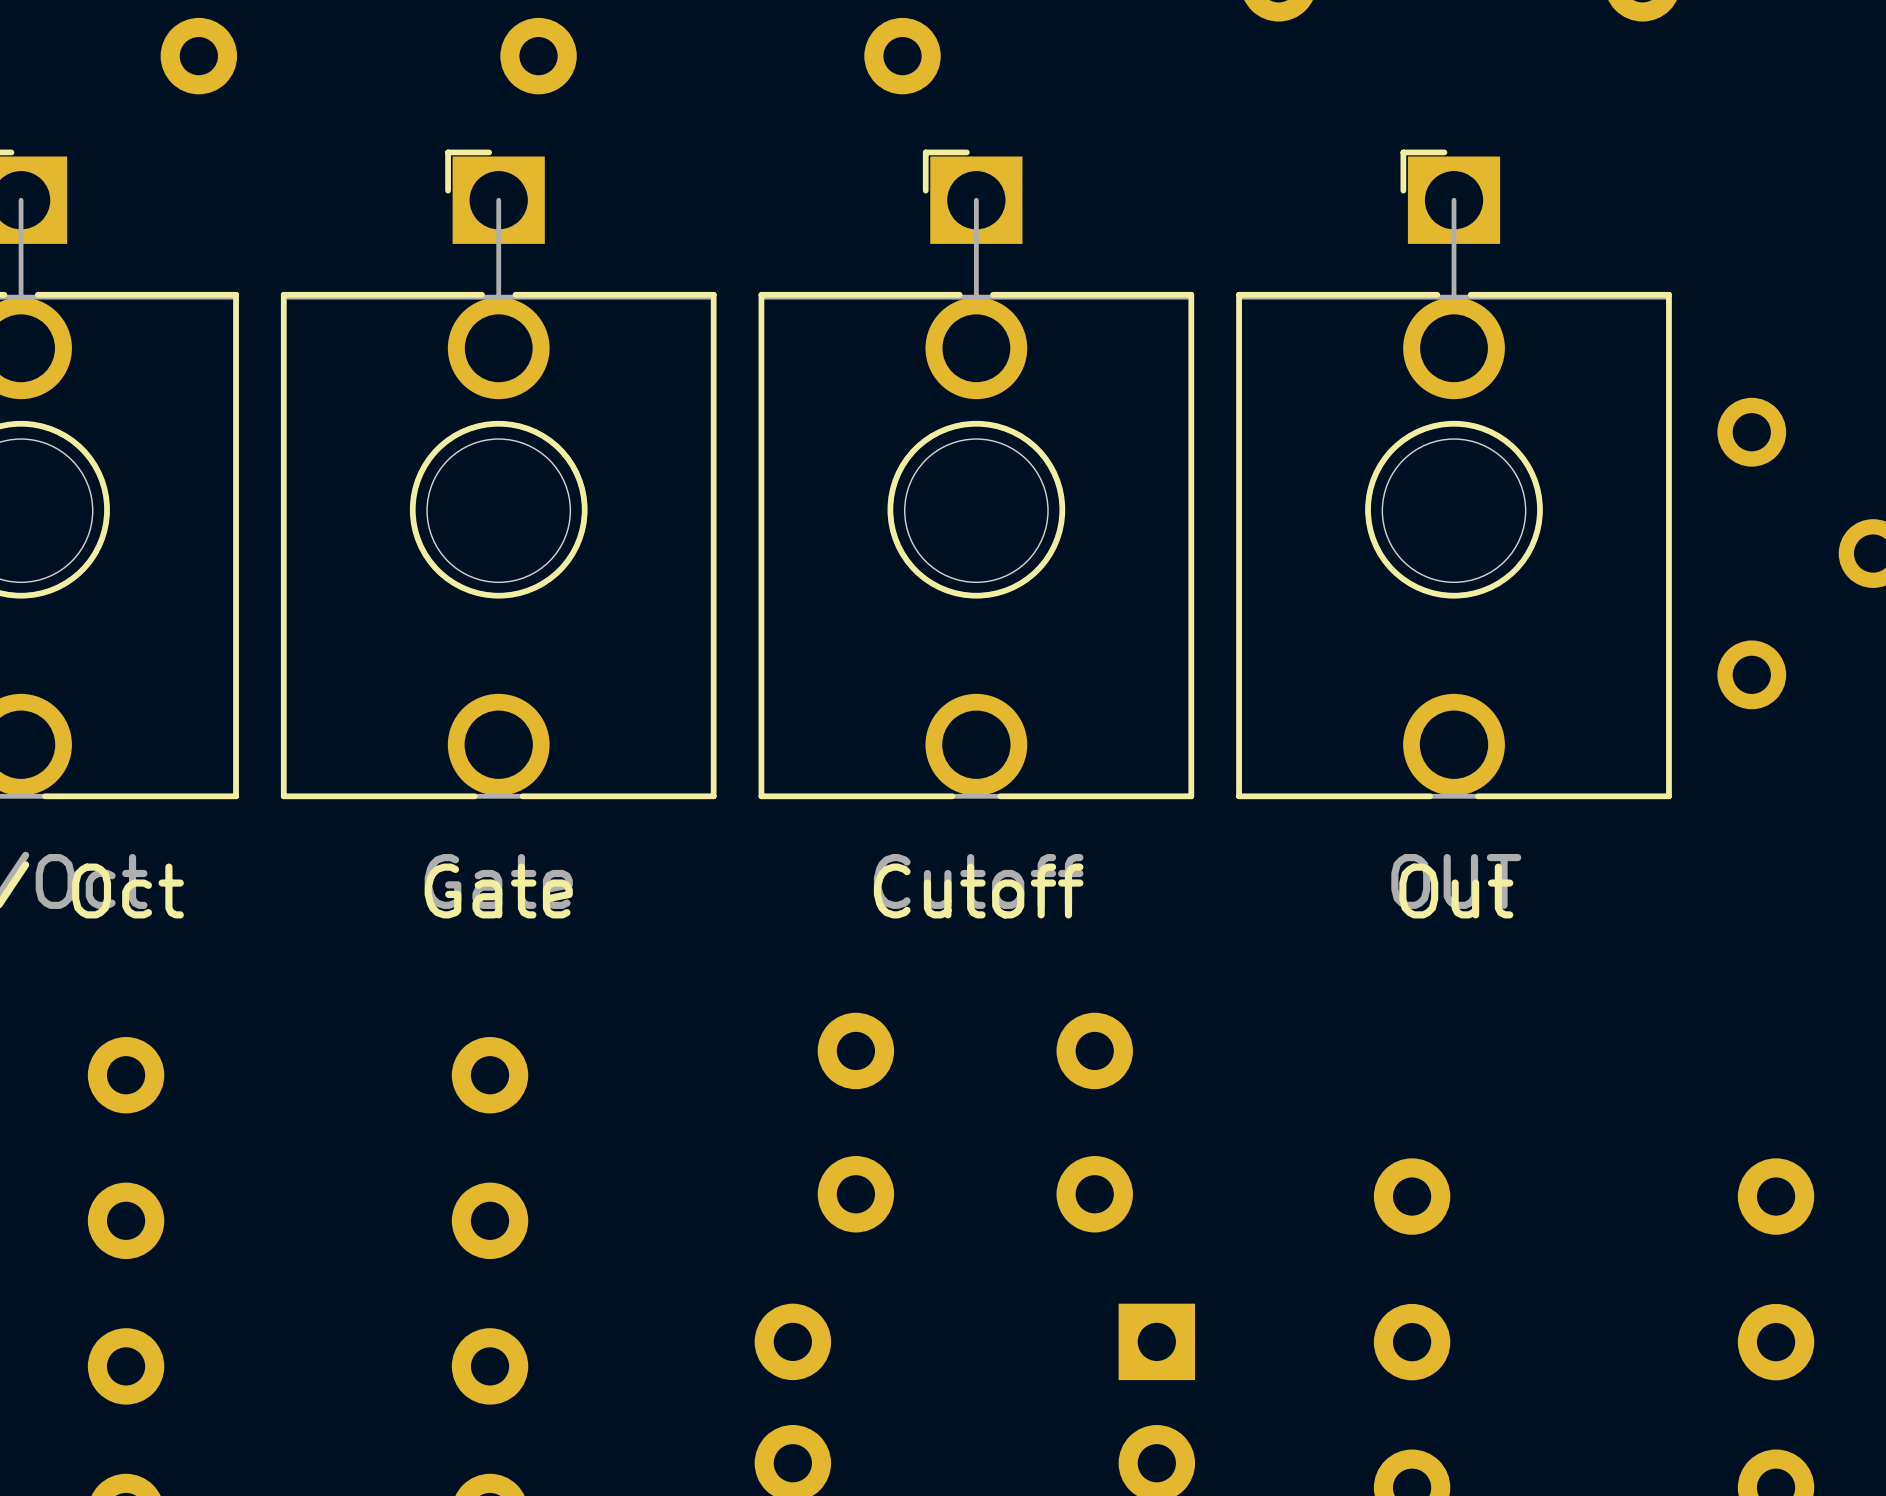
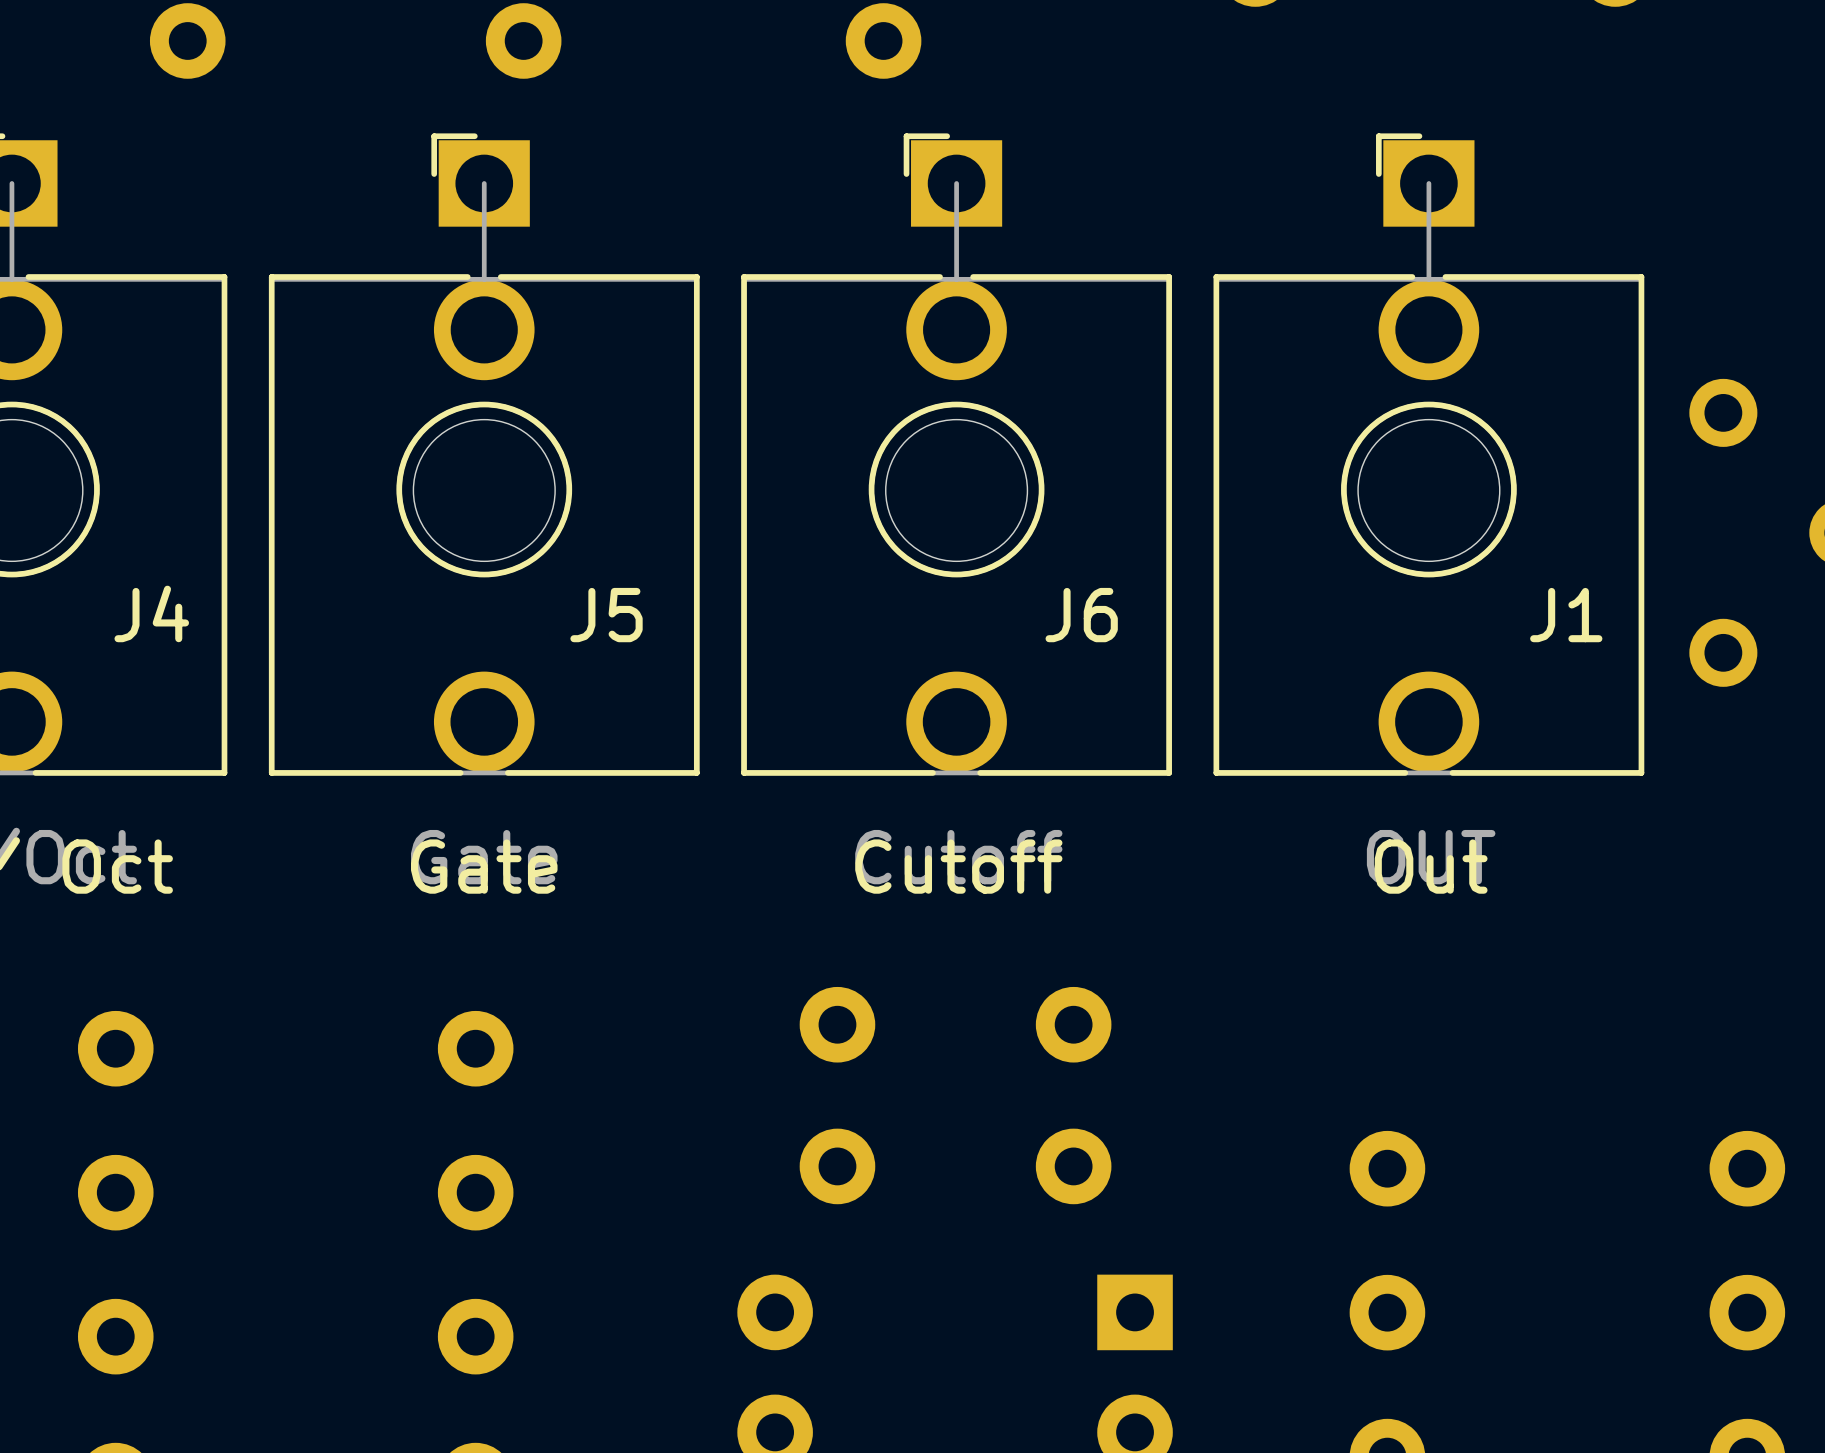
J4 name: none -> J4 (151, 613)
J5 name: none -> J5 (606, 615)
J6 name: none -> J6 (1081, 615)
J1 name: none -> J1 (1566, 615)

